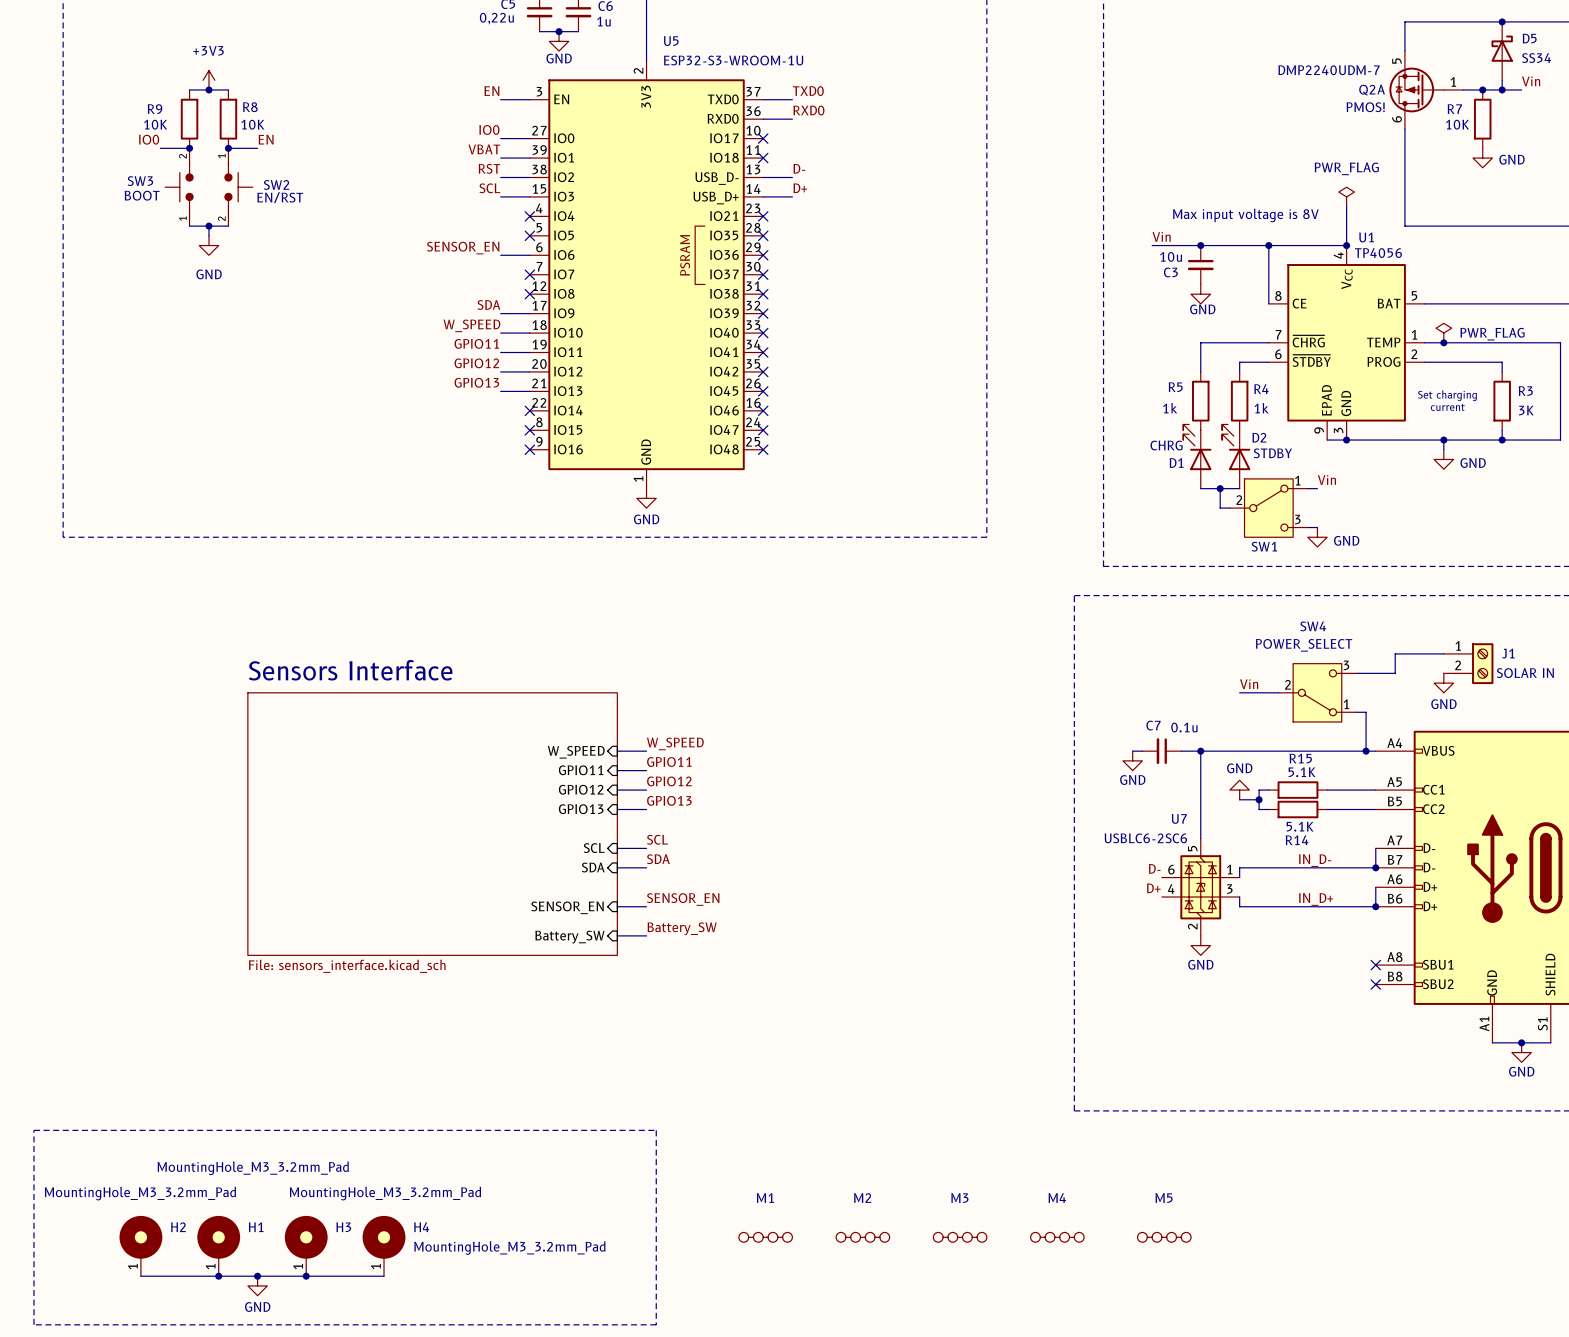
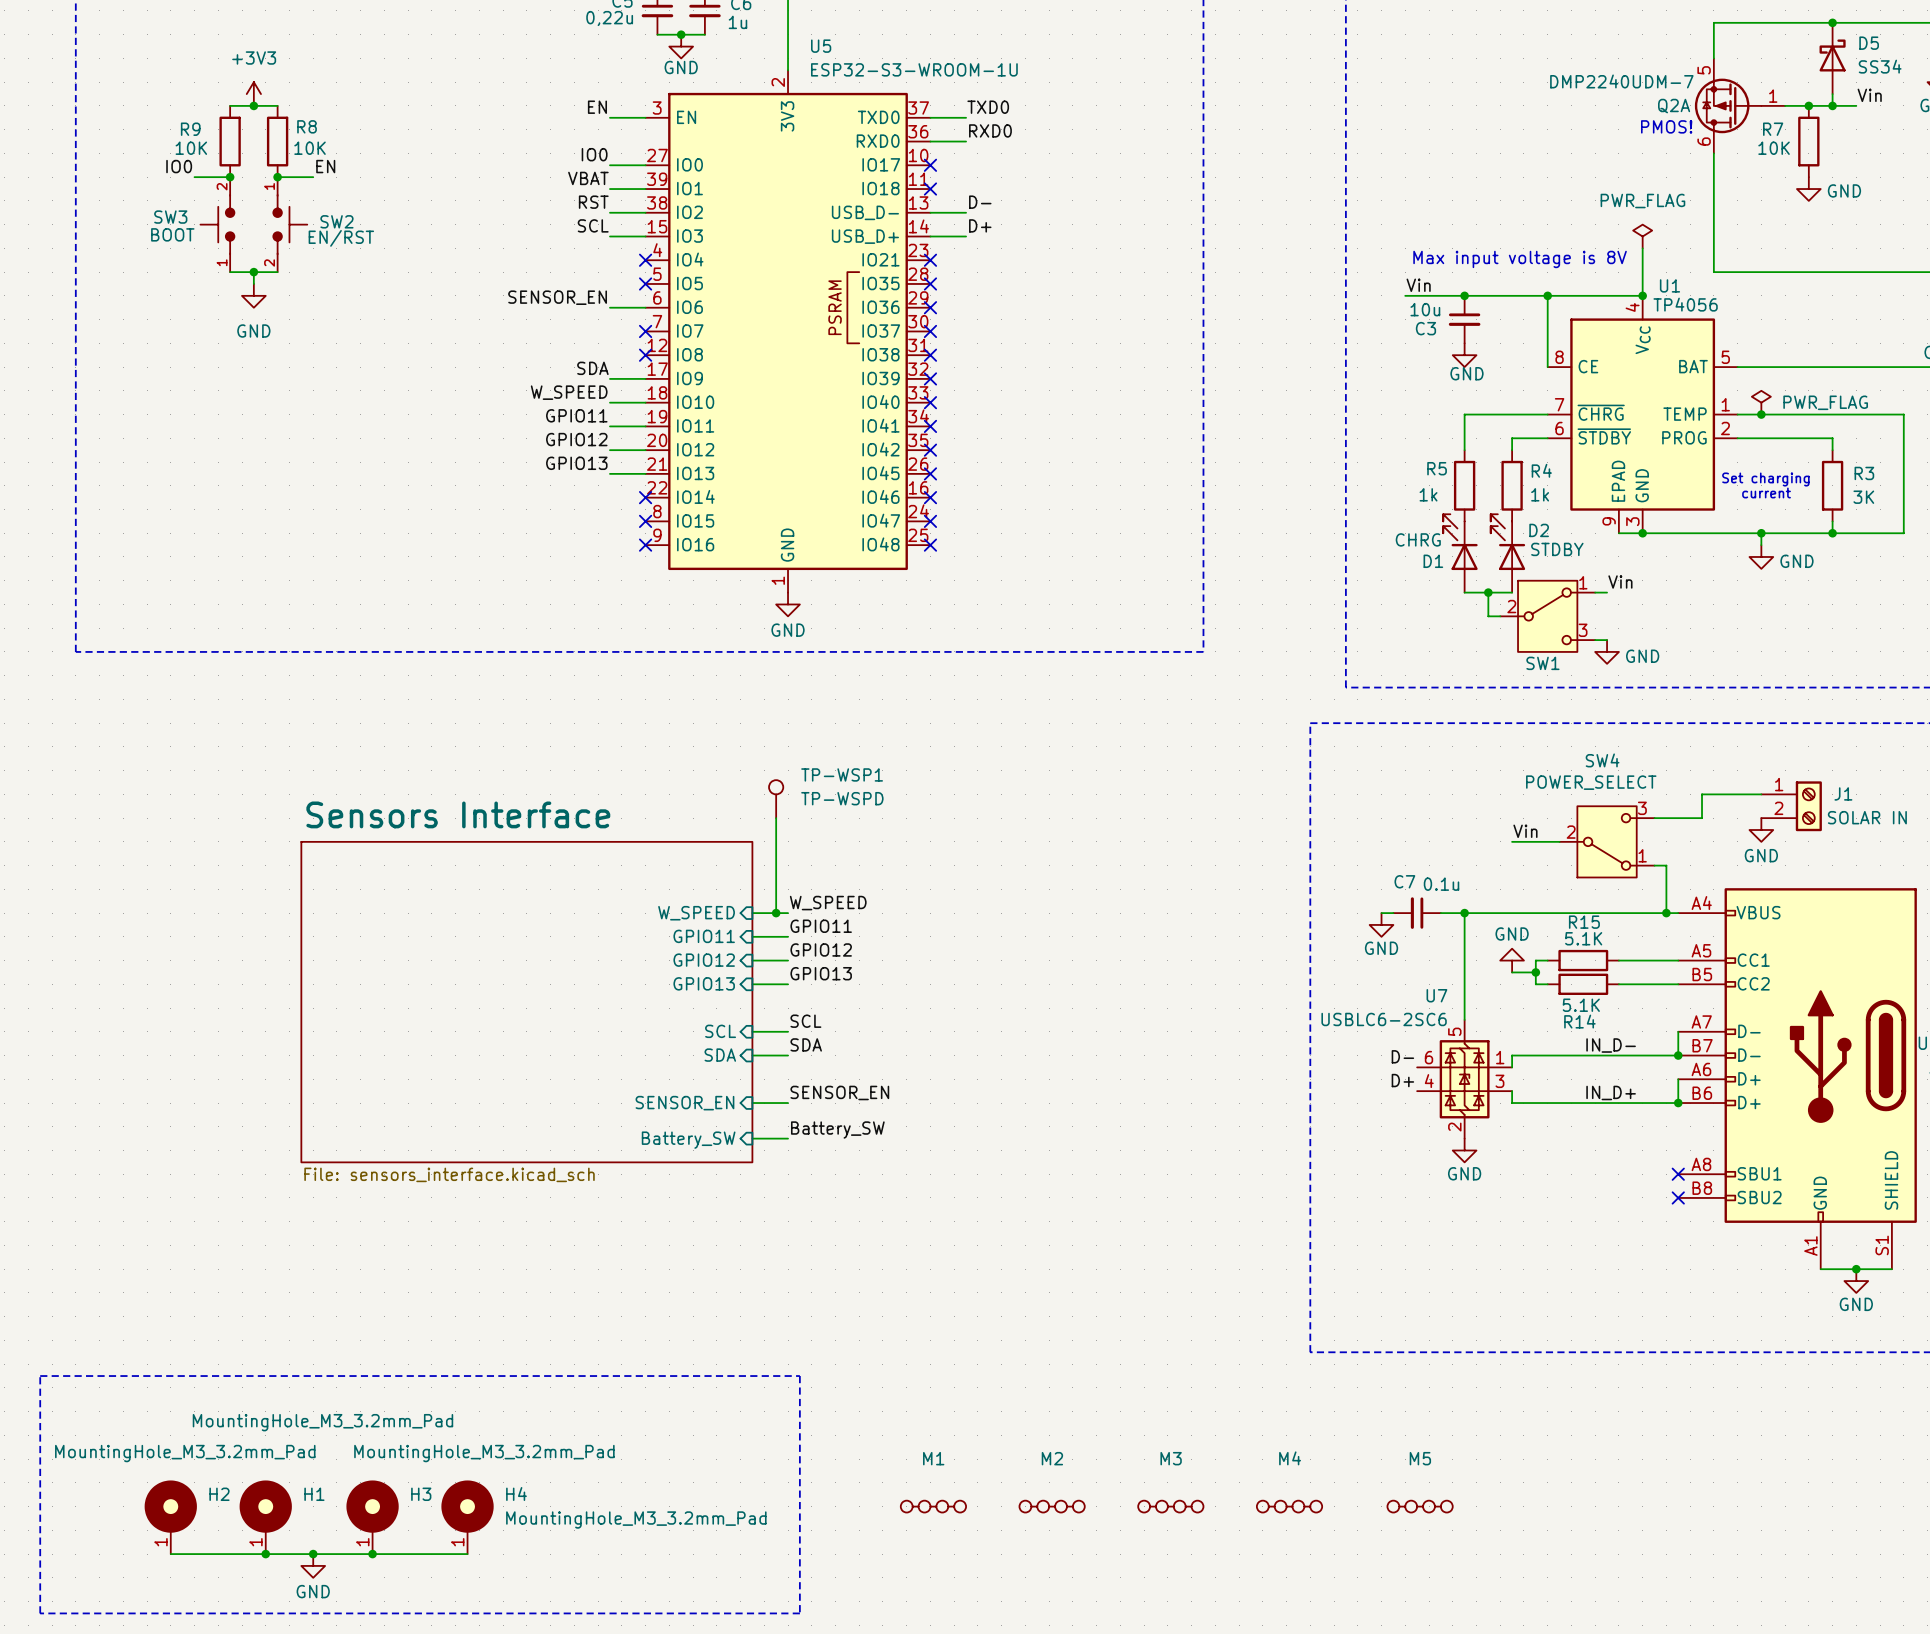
TP-WSP1: none -> TP-WSPD (776, 799)
wire: none -> (776, 818) (776, 913)
junction: none -> (776, 913)

